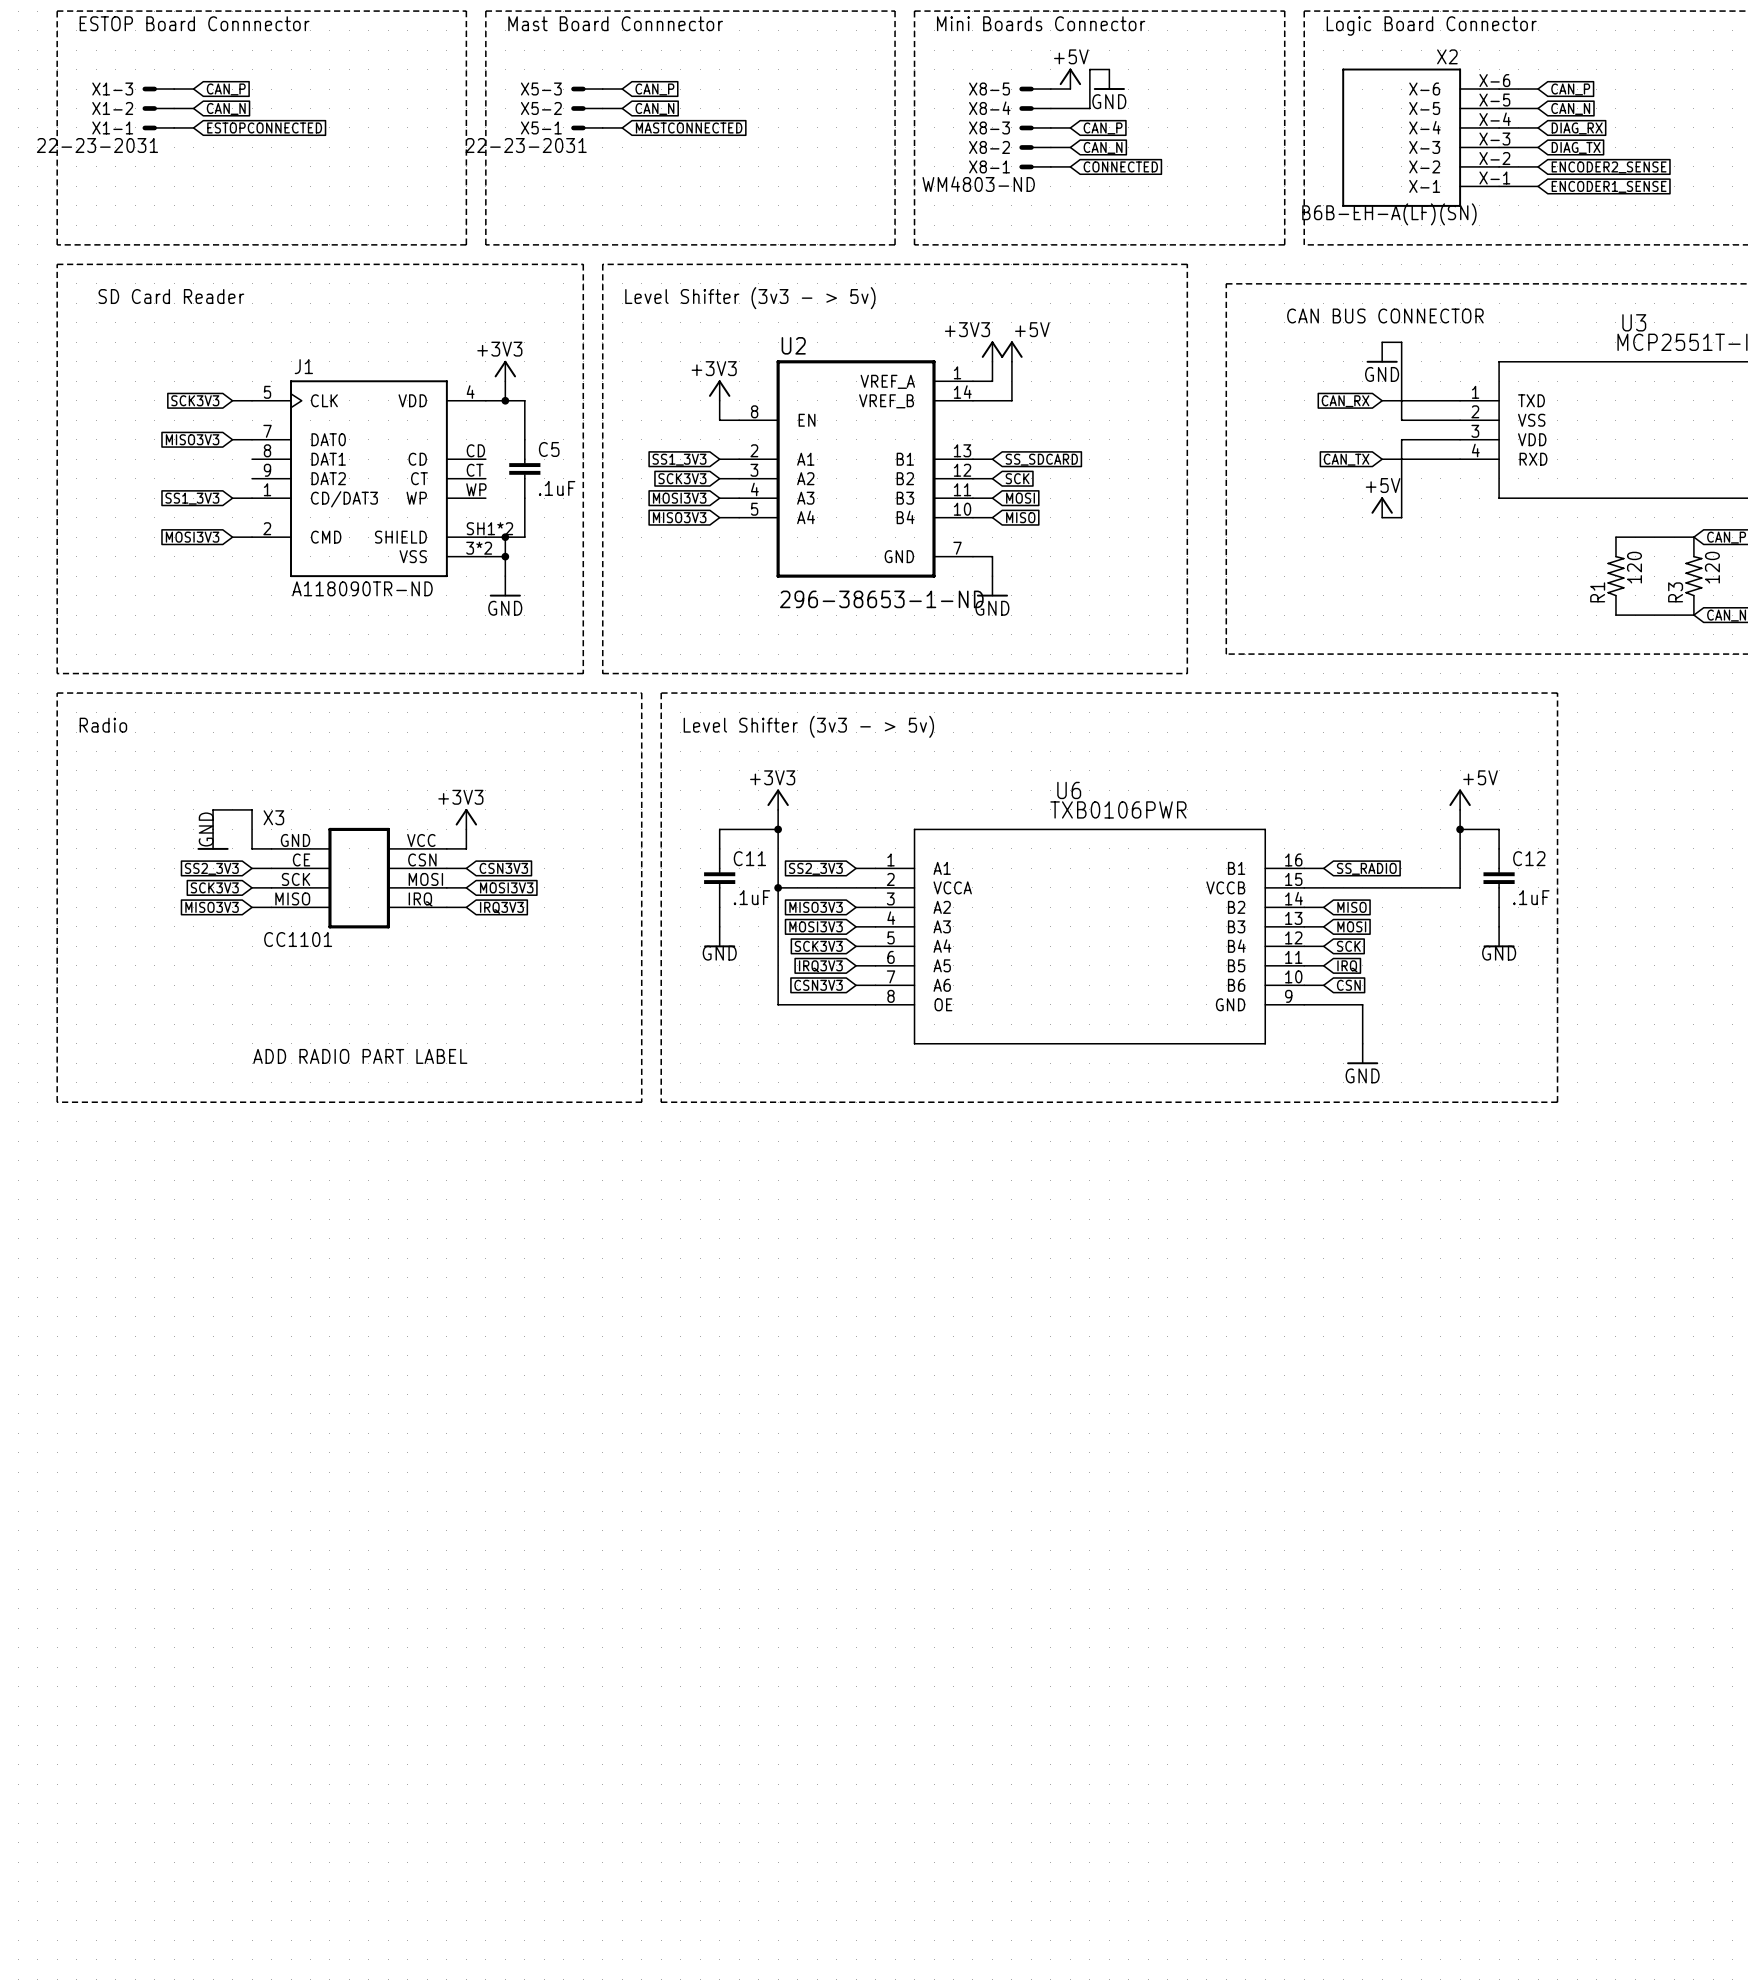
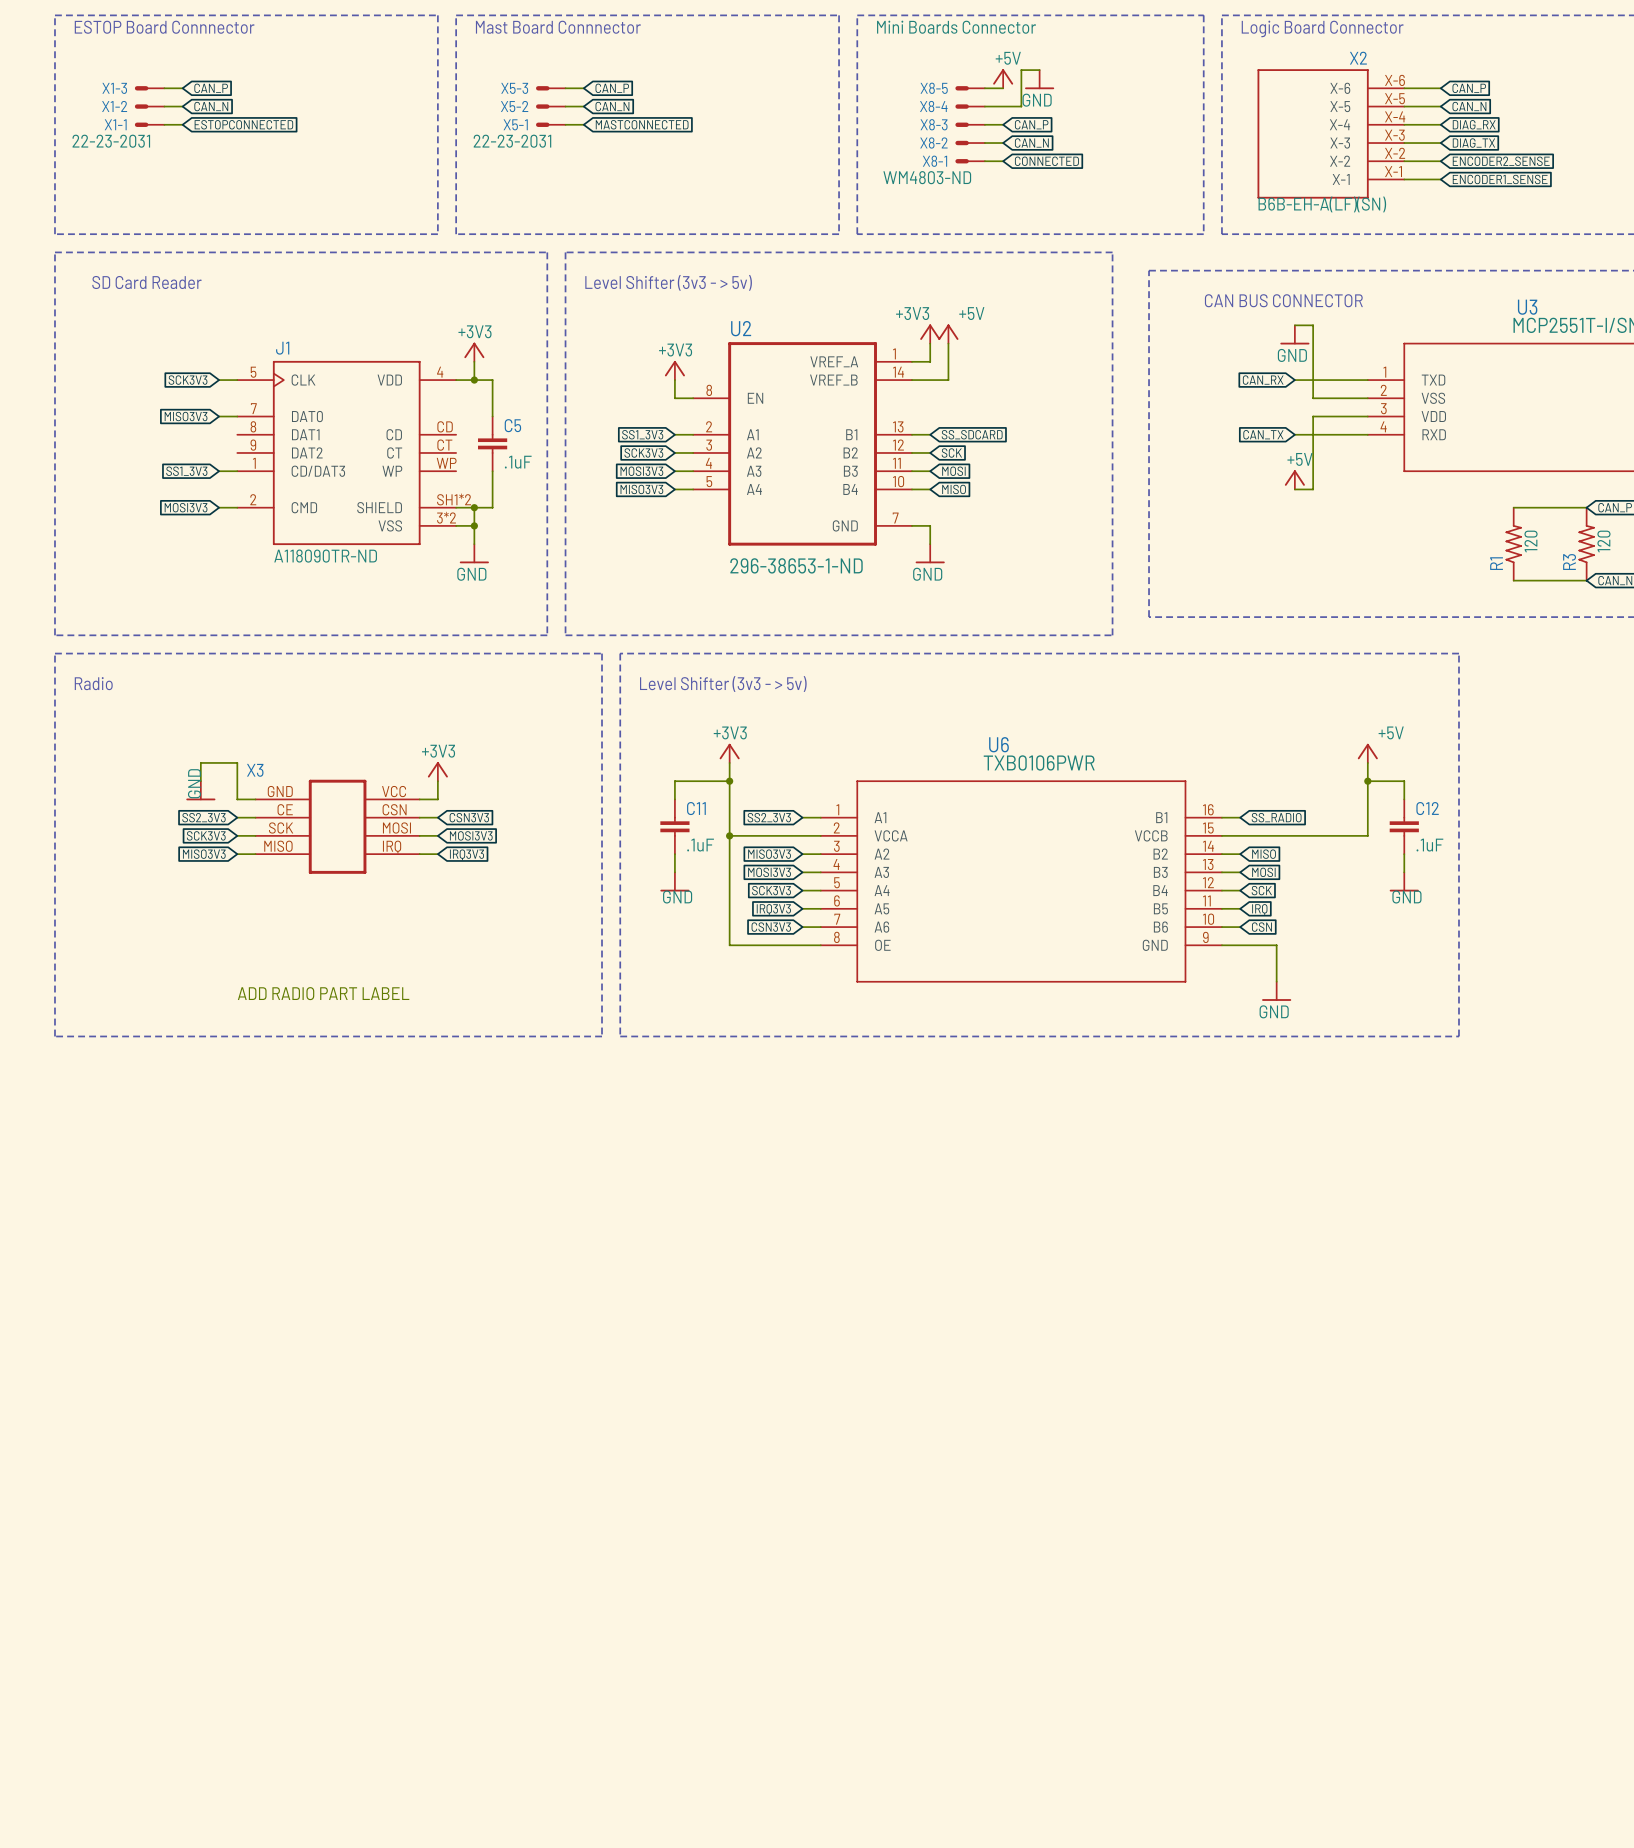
X3 value: CC1101 (298, 939) -> none

